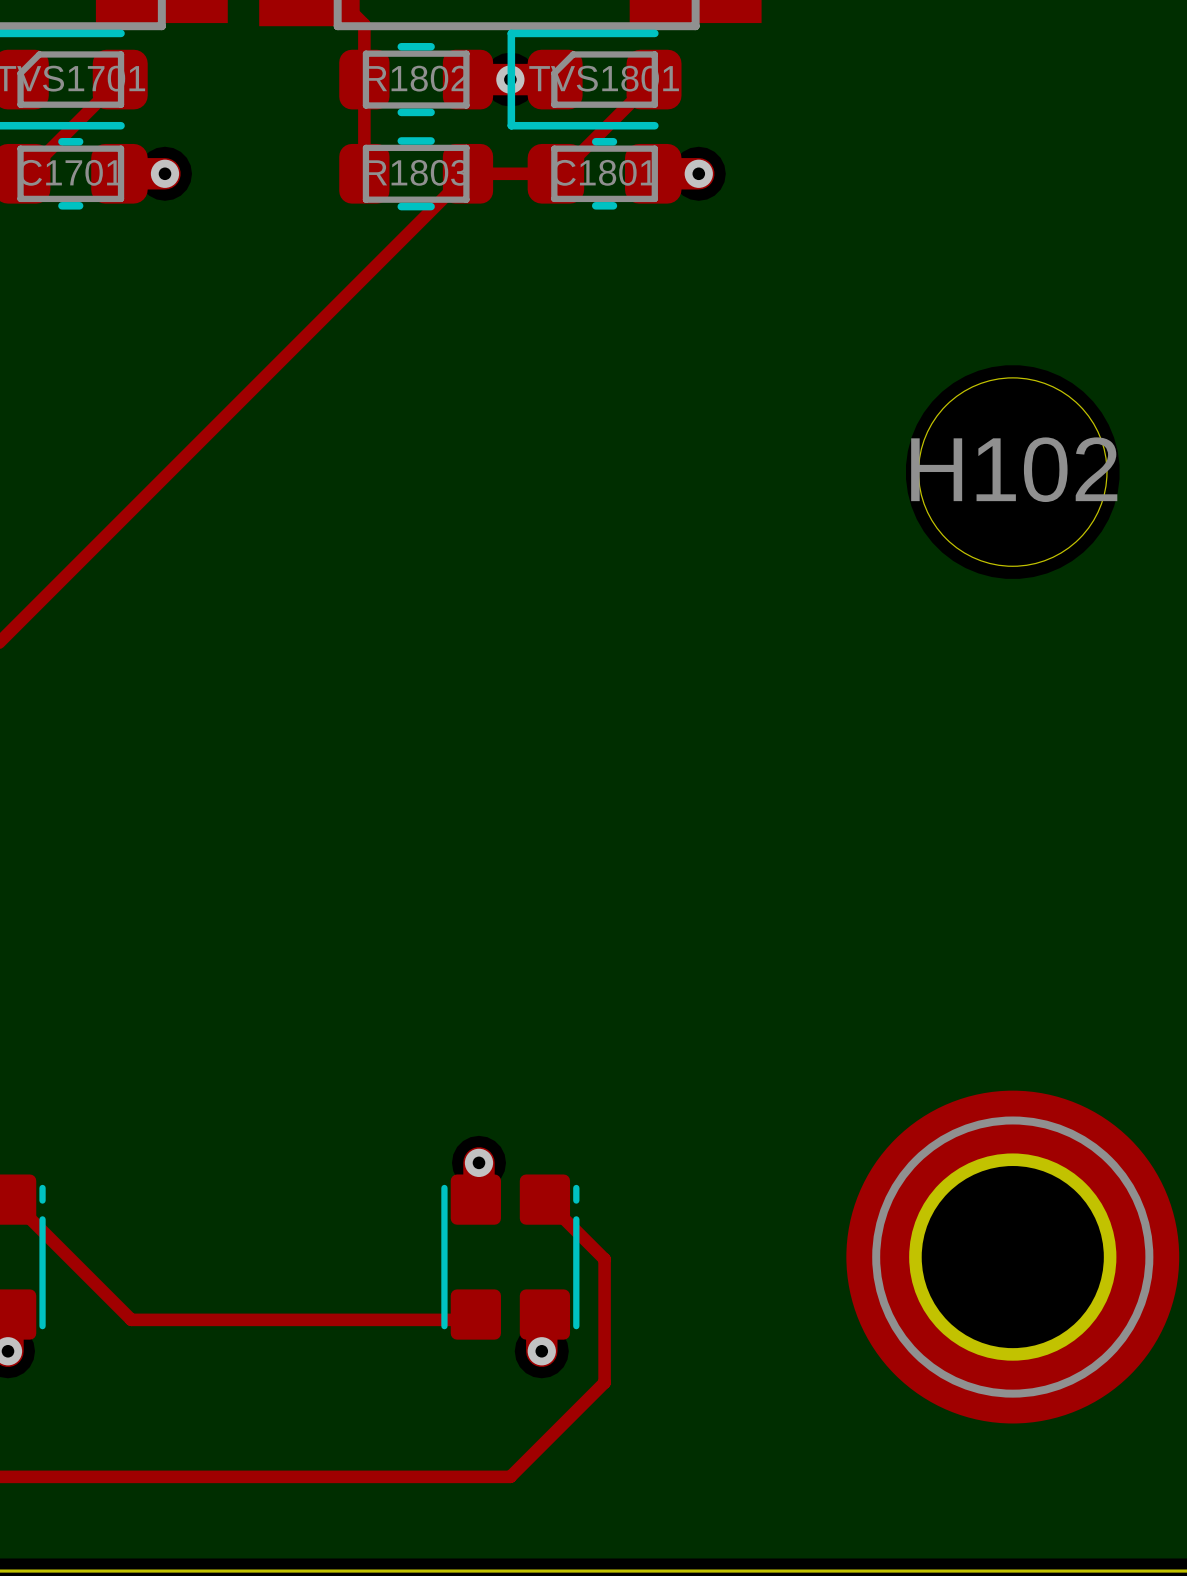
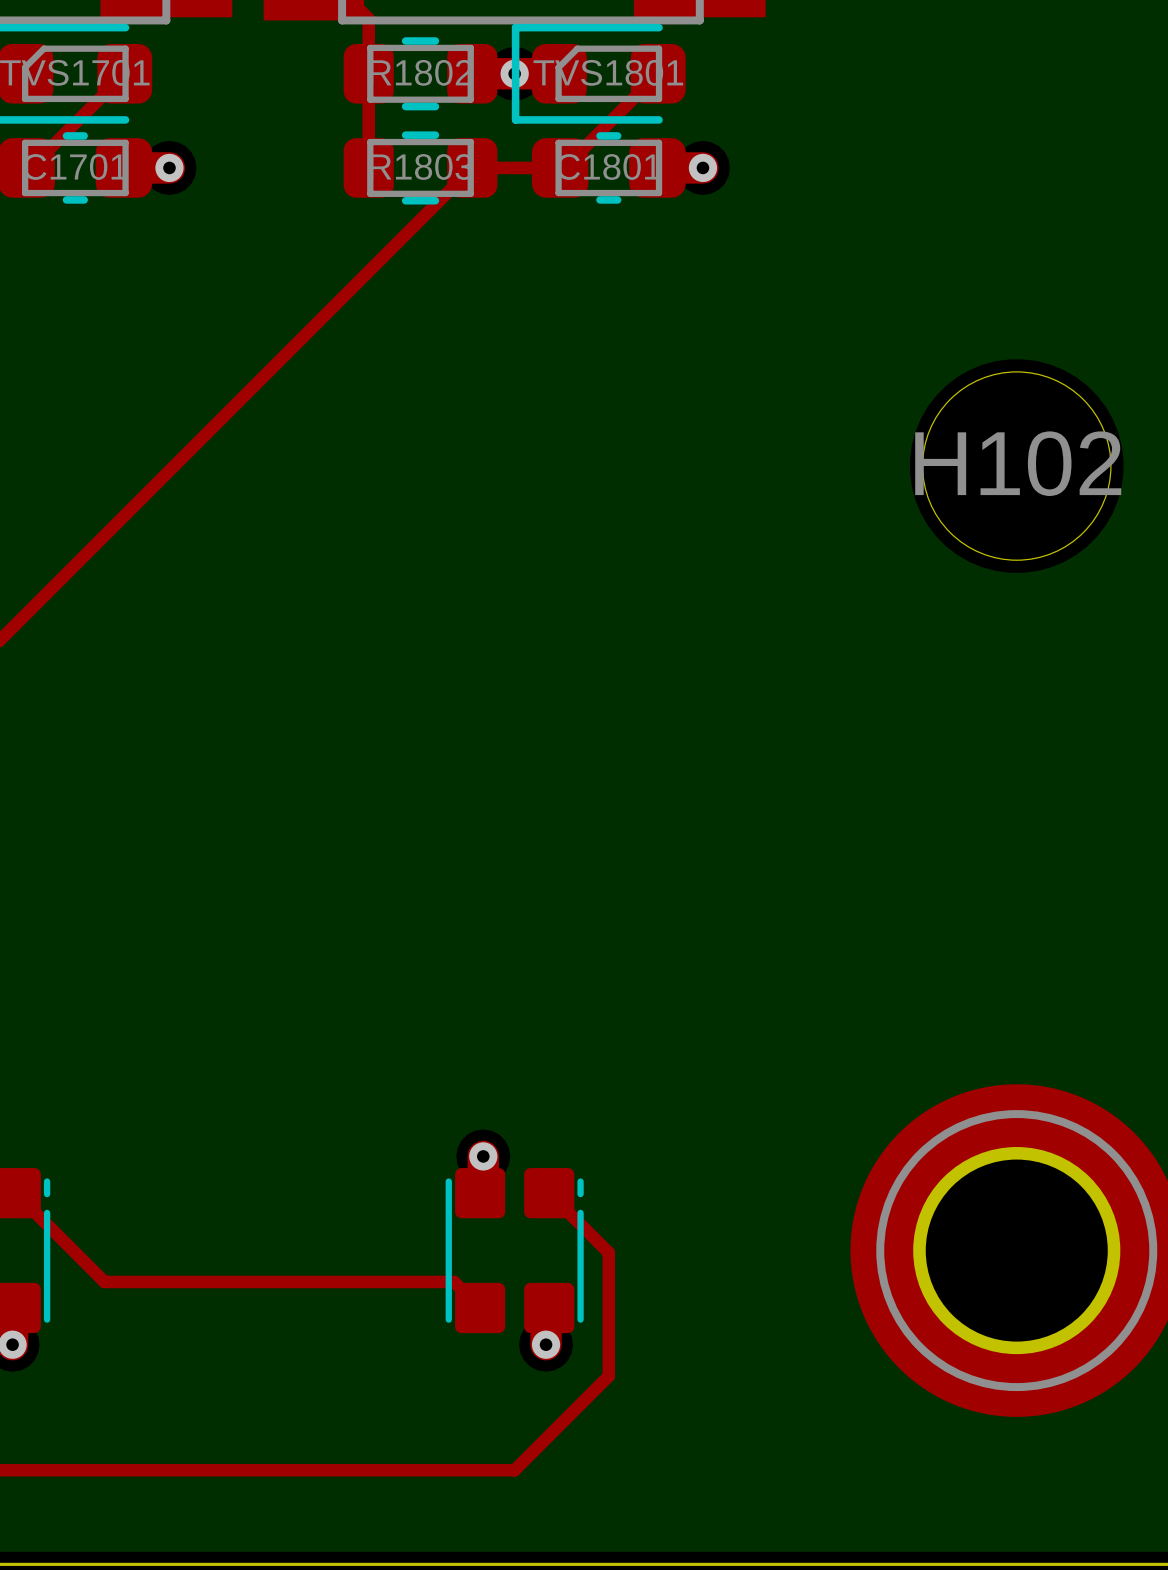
top track: (99, 1288) (131, 1319) (470, 1319) (475, 1314) -> (104, 1281) (454, 1281) (480, 1308)

